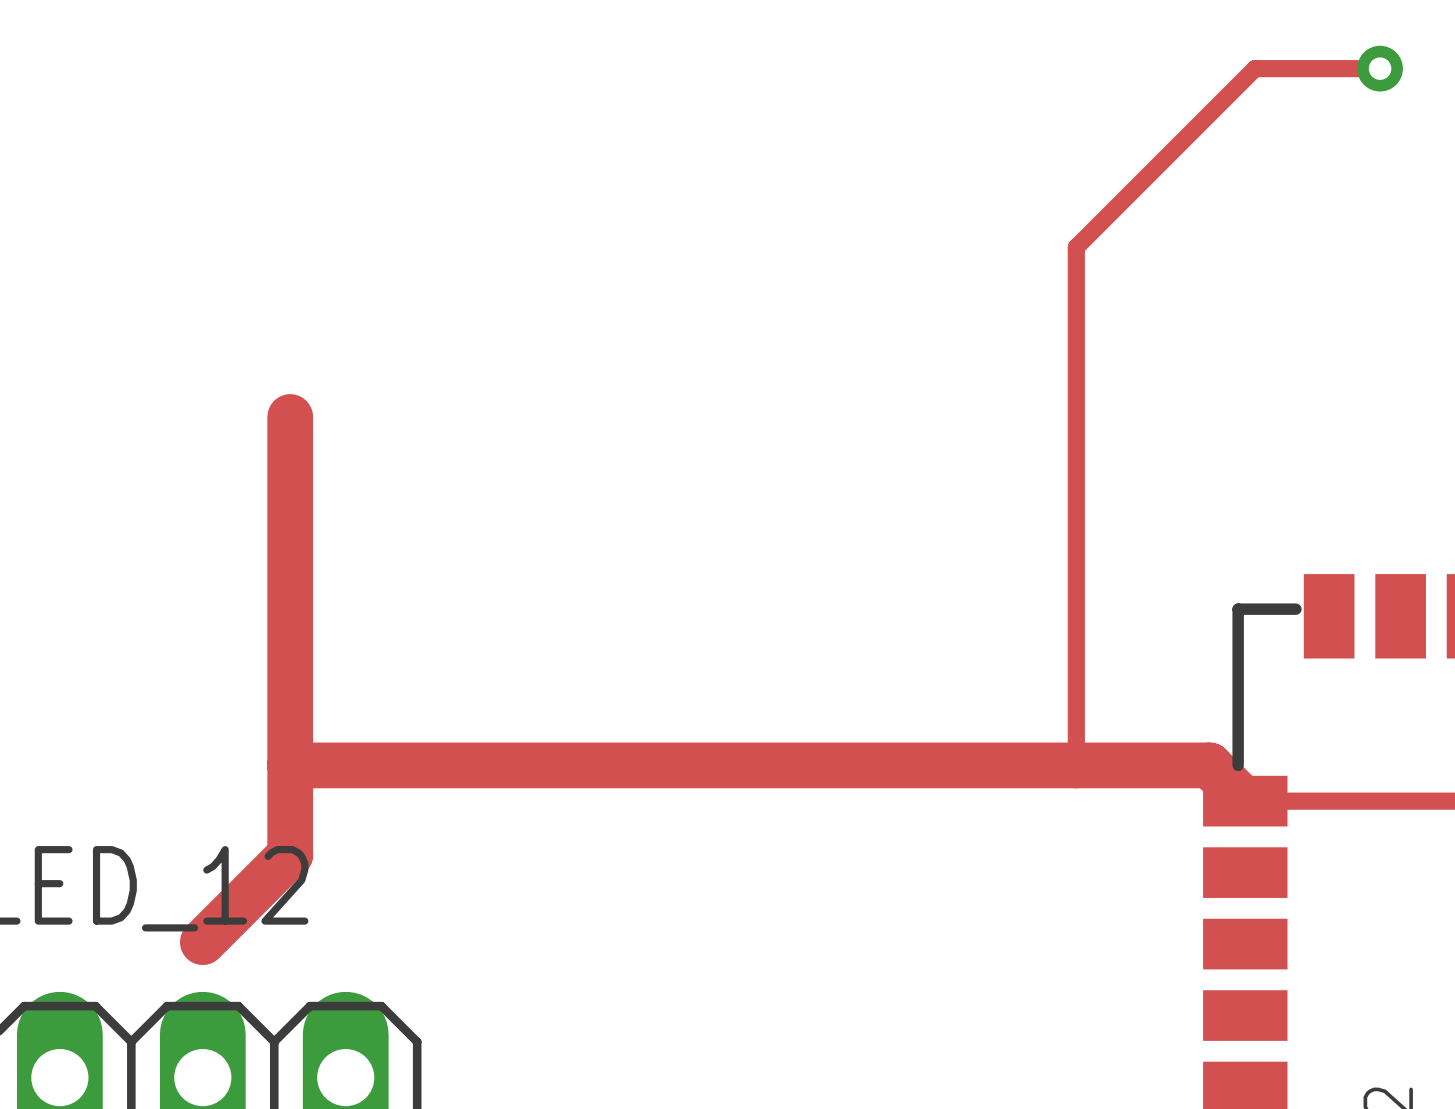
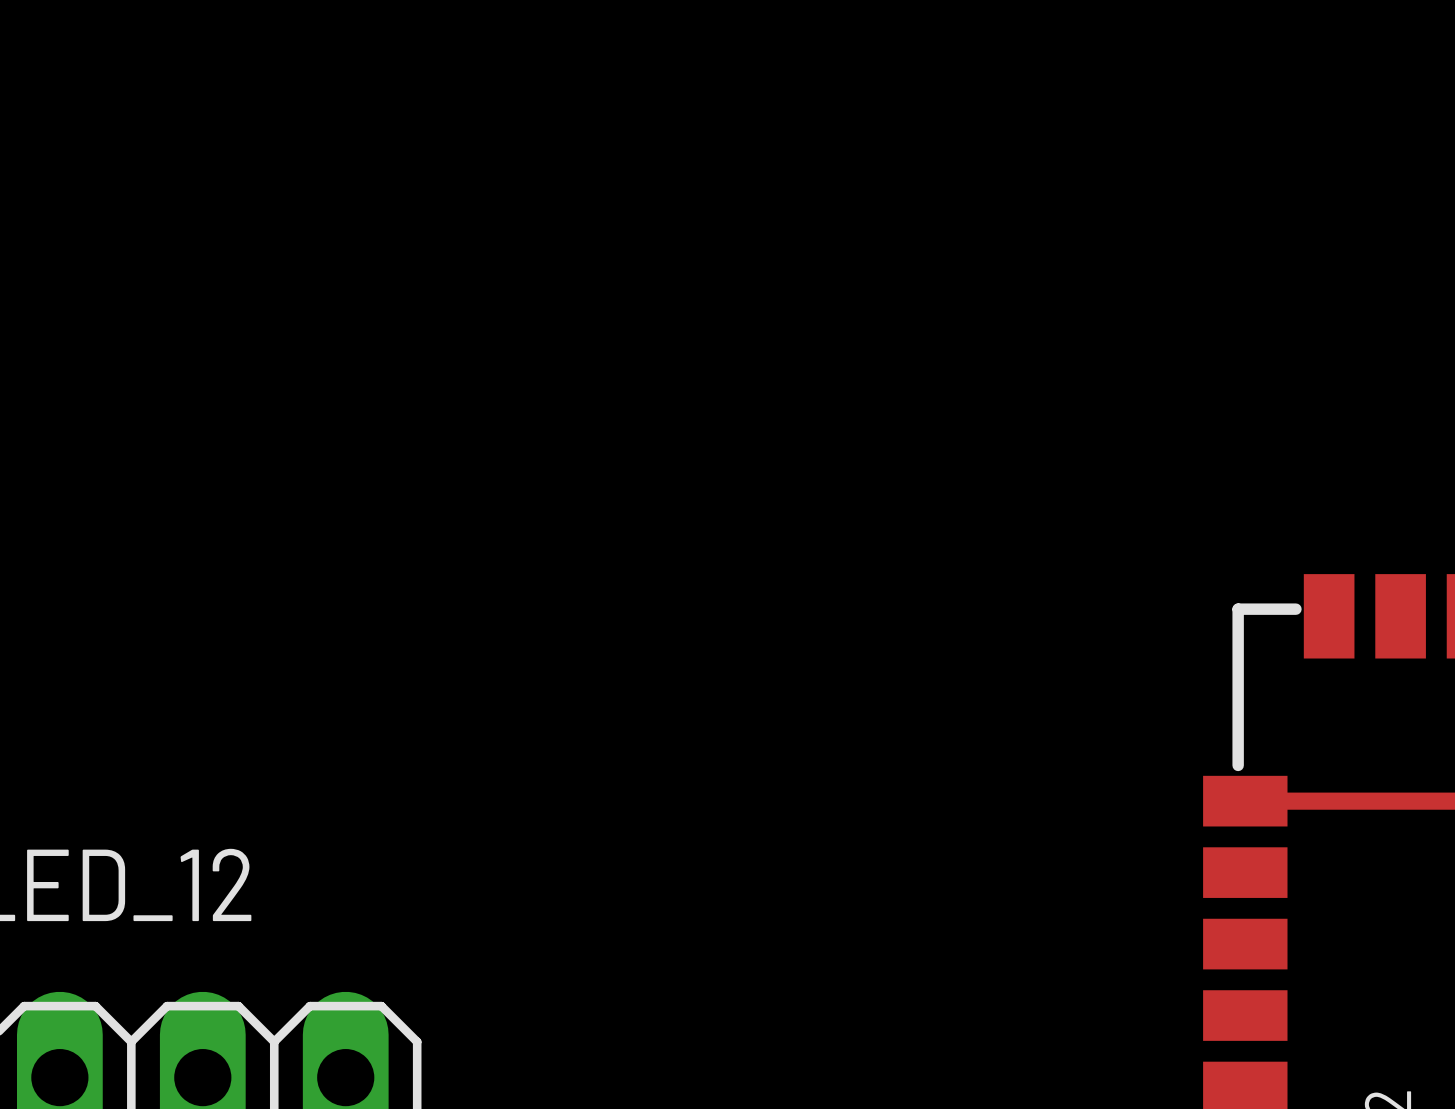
track: (1380, 68) (1255, 68) (1076, 247) (1076, 765) -> none
via: (1380, 68) -> none
track: (290, 416) (290, 854) (202, 942) -> none
track: (290, 765) (1209, 765) (1245, 801) -> none

